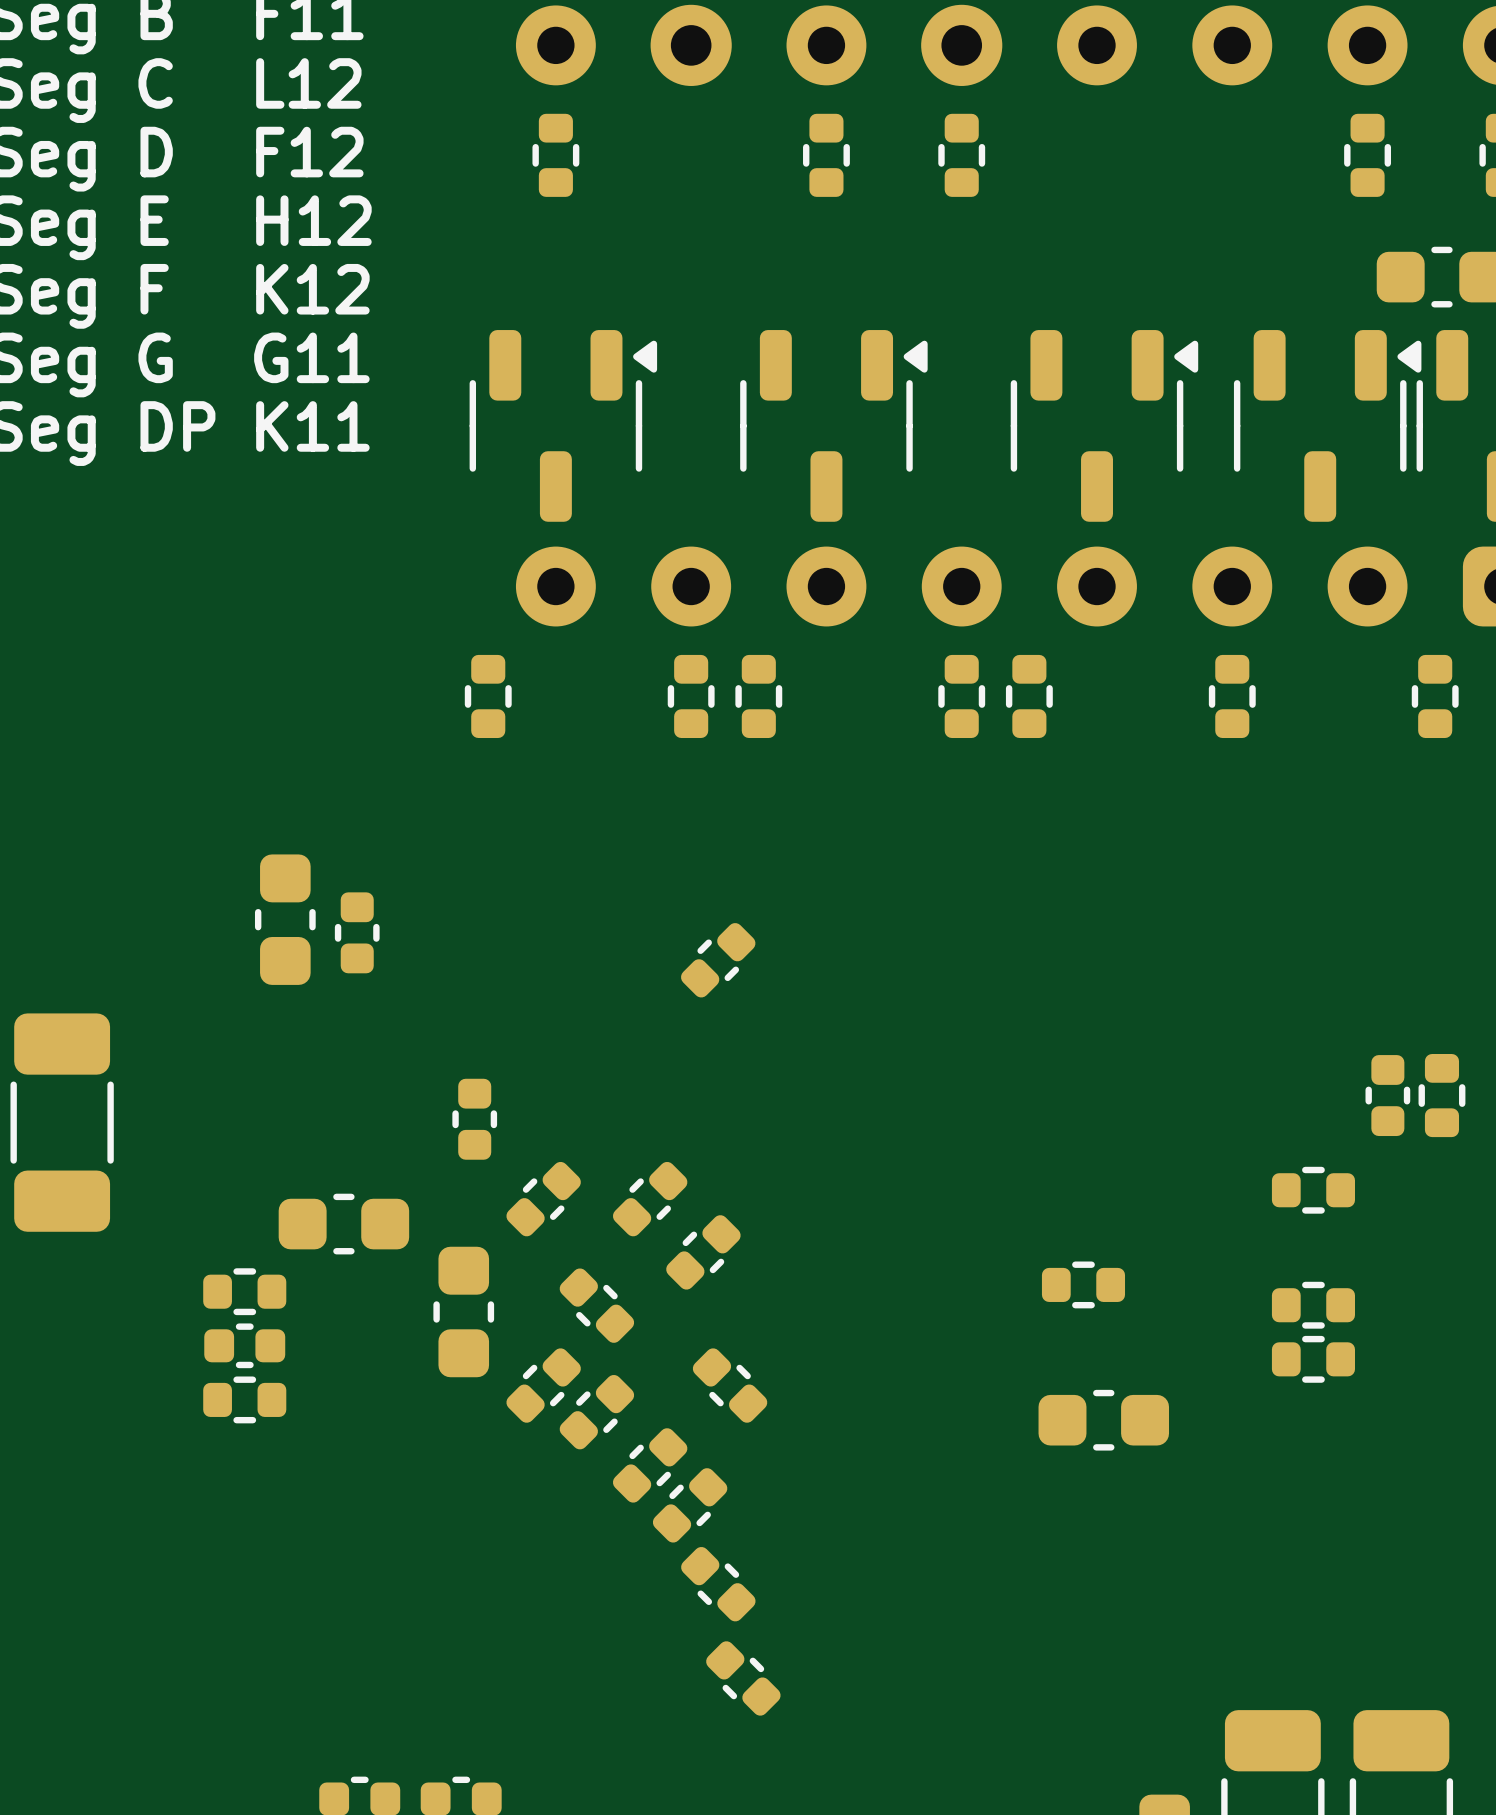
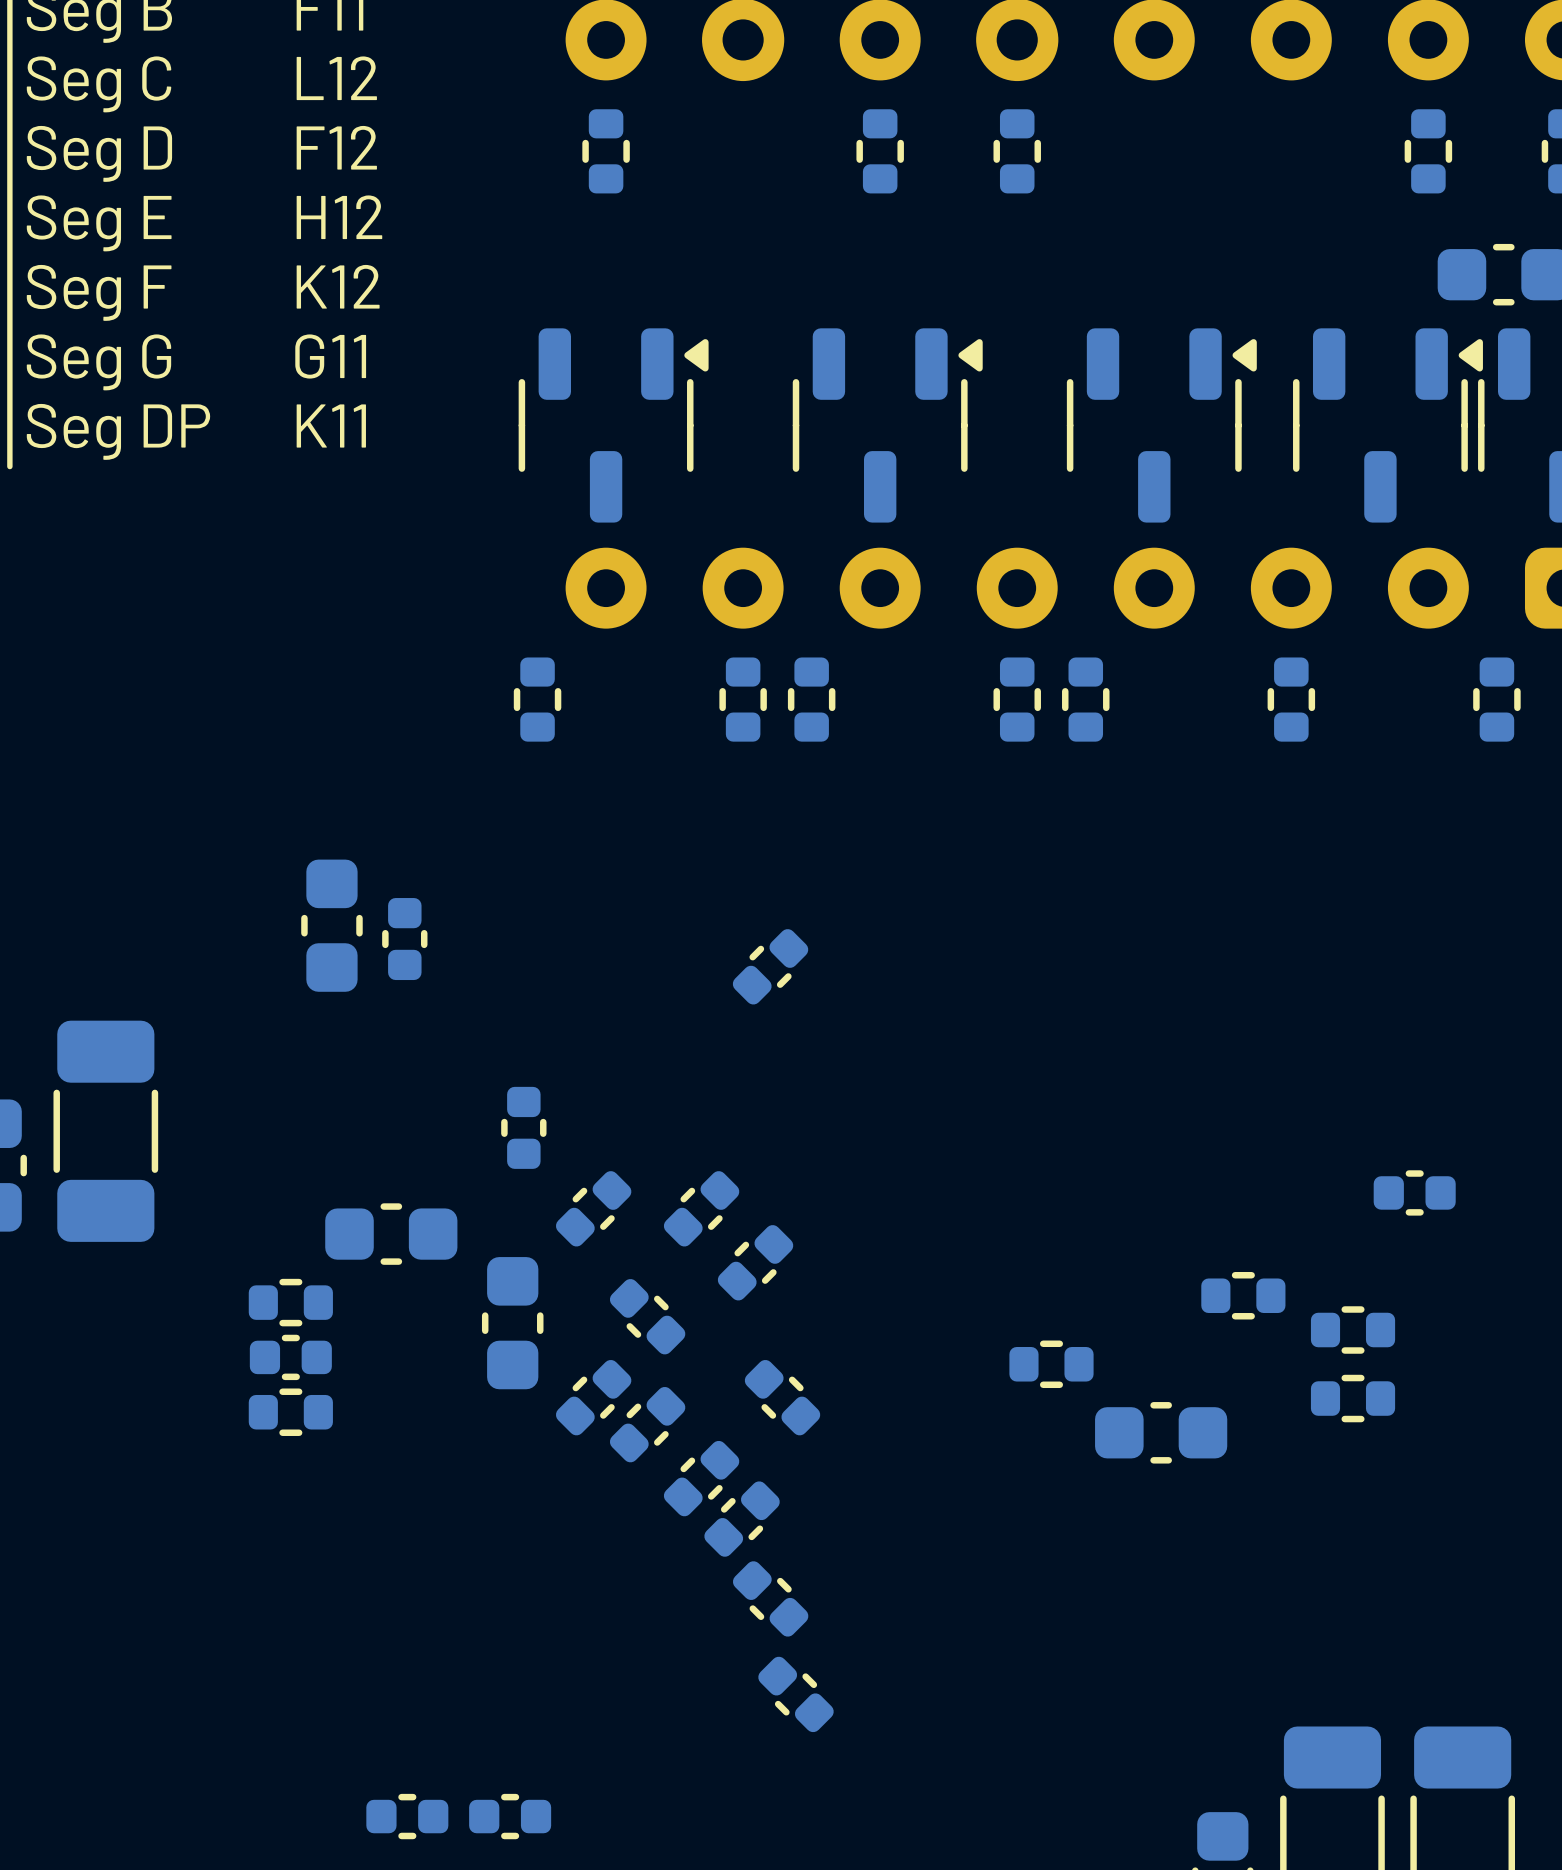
part: (1387, 1095) -> none
part: (1441, 1095) -> none
part footprint: [1271, 1166, 1356, 1214] -> [1373, 1170, 1456, 1216]
part: (1083, 1284) -> none
part: none -> (1243, 1295)
part: (1313, 1305) -> none
part: none -> (1353, 1330)
part: none -> (1051, 1364)
part: (1313, 1359) -> none
part: none -> (1353, 1398)

